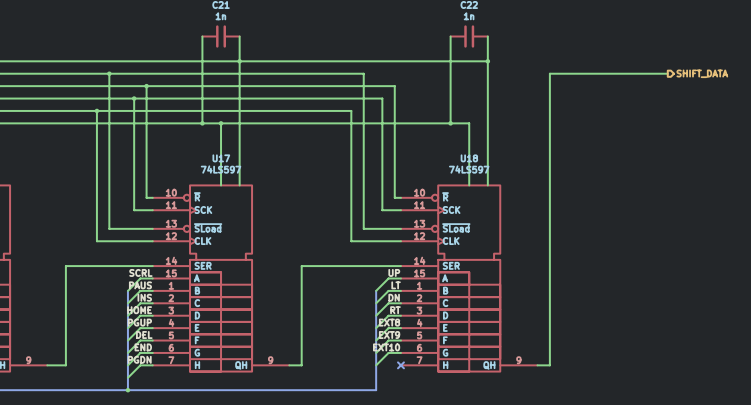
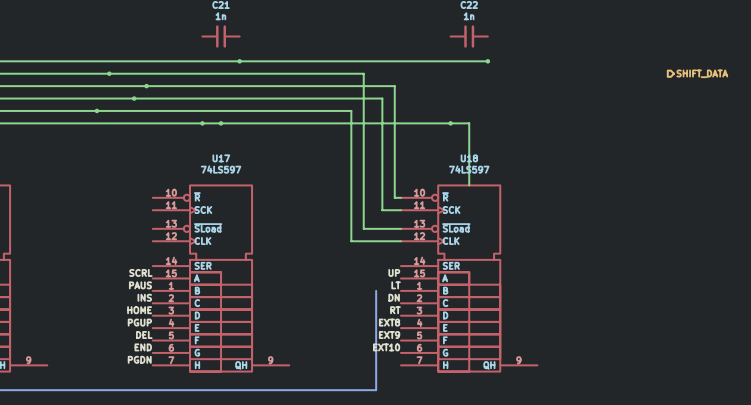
wire: (202, 36) (202, 123) -> none
wire: (239, 36) (239, 185) -> none
wire: (450, 36) (450, 123) -> none
wire: (487, 36) (487, 185) -> none
wire: (109, 73) (109, 228) (152, 228) -> none
wire: (667, 73) (549, 73) (549, 365) (537, 365) -> none
wire: (146, 86) (146, 197) (152, 197) -> none
wire: (134, 98) (134, 210) (152, 210) -> none
wire: (96, 110) (96, 241) (152, 241) -> none
wire: (221, 123) (221, 185) -> none
wire: (152, 266) (65, 266) (65, 365) (47, 365) -> none
wire: (400, 266) (301, 266) (301, 365) (289, 365) -> none
wire: (152, 278) (140, 278) (127, 290) -> none
wire: (400, 278) (388, 278) (376, 290) -> none
bus: (127, 290) (127, 390) -> none
wire: (152, 290) (140, 290) (127, 303) -> none
wire: (400, 290) (388, 290) (376, 303) -> none
wire: (152, 303) (140, 303) (127, 315) -> none
wire: (400, 303) (388, 303) (376, 315) -> none
wire: (152, 315) (140, 315) (127, 328) -> none
wire: (400, 315) (388, 315) (376, 328) -> none
wire: (152, 328) (140, 328) (127, 340) -> none
wire: (400, 328) (388, 328) (376, 340) -> none
wire: (152, 340) (140, 340) (127, 352) -> none
wire: (400, 340) (388, 340) (376, 352) -> none
wire: (152, 352) (140, 352) (127, 365) -> none
wire: (400, 352) (388, 352) (376, 365) -> none
wire: (152, 365) (140, 365) (127, 377) -> none
no-connect mark: (400, 365) -> none
junction: (127, 390) -> none

